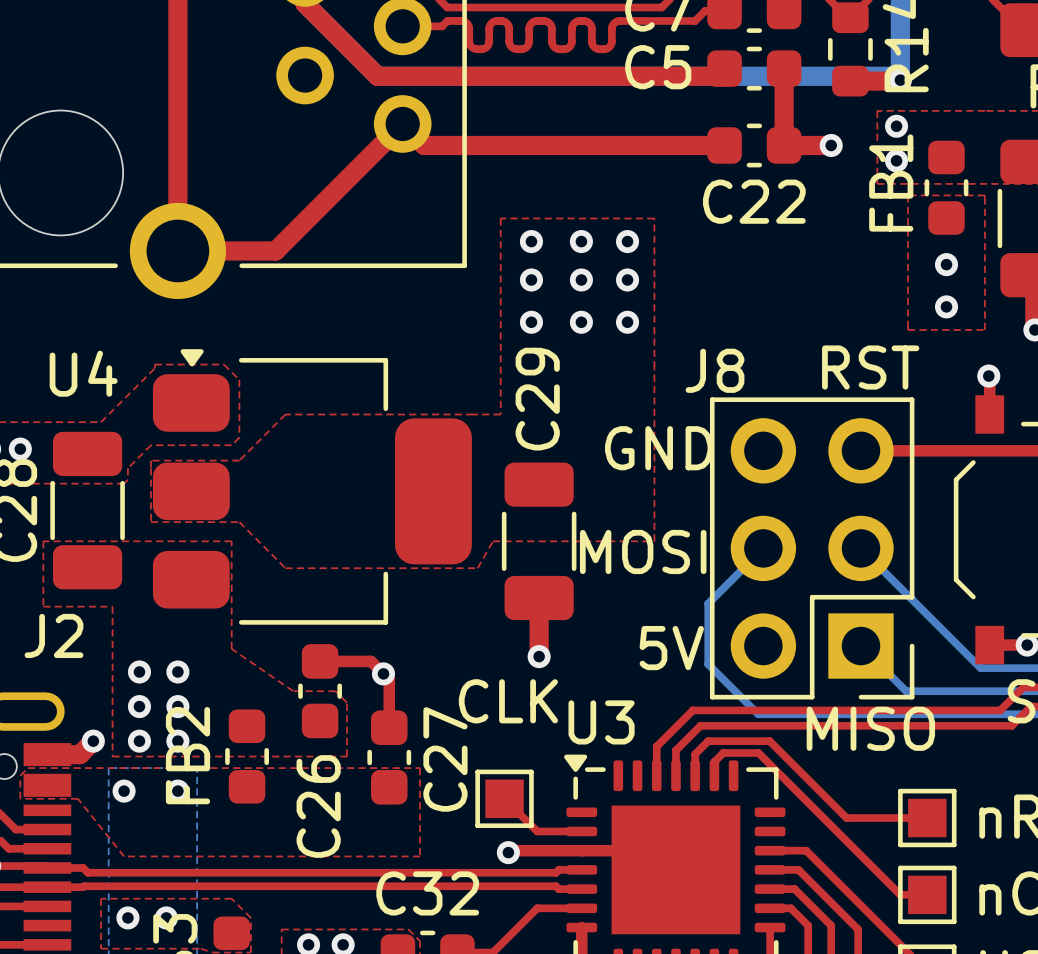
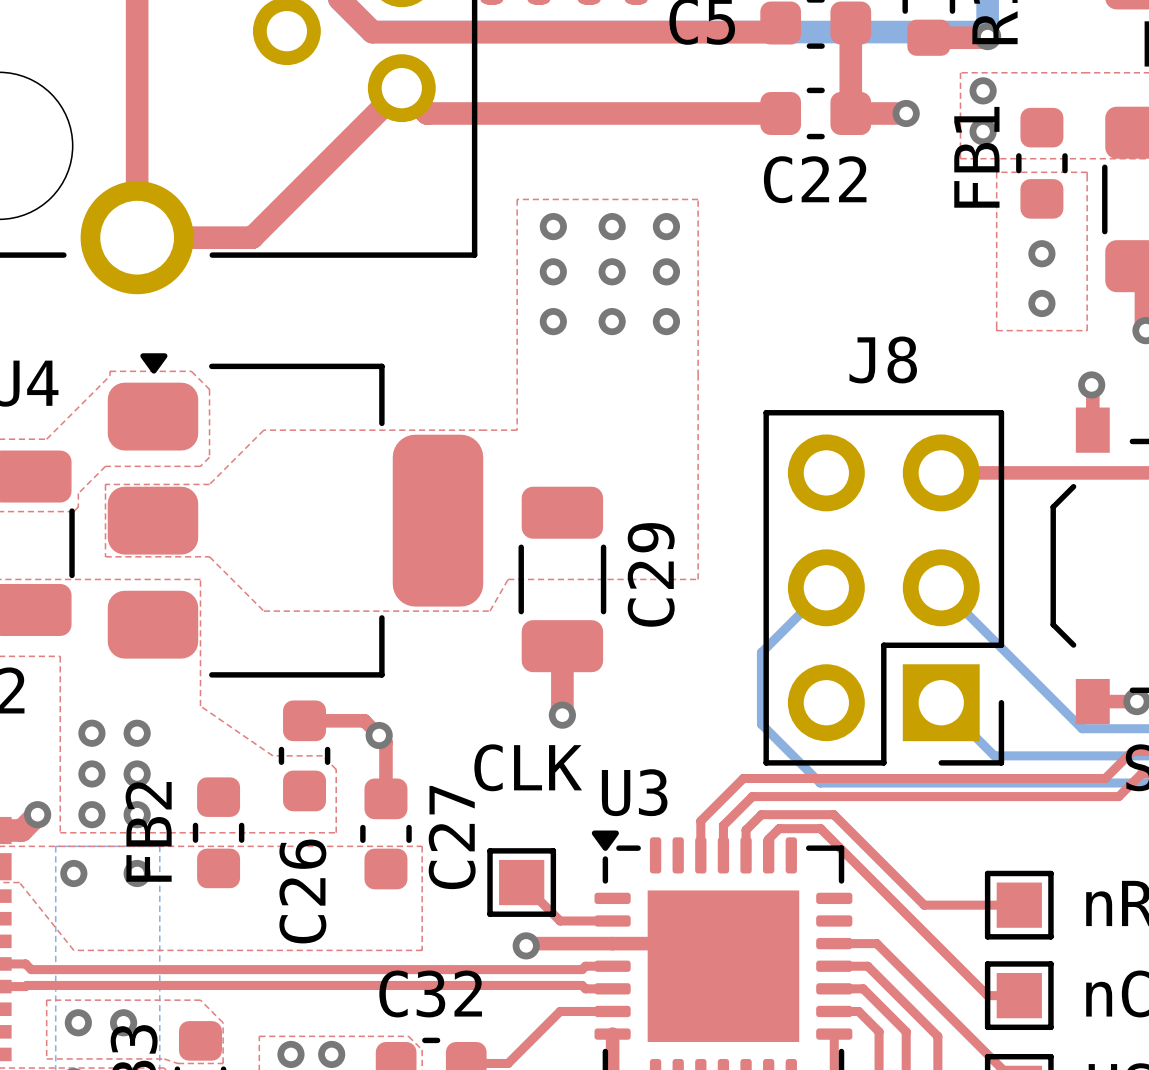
text: RST (870, 367) -> none
J8 name position: J8 (715, 370) -> J8 (883, 359)
C29 name position: C29 (537, 399) -> C29 (651, 574)
text: GND (659, 448) -> none
text: MOSI (643, 551) -> none
text: 5V (671, 648) -> none
text: MISO (870, 728) -> none

